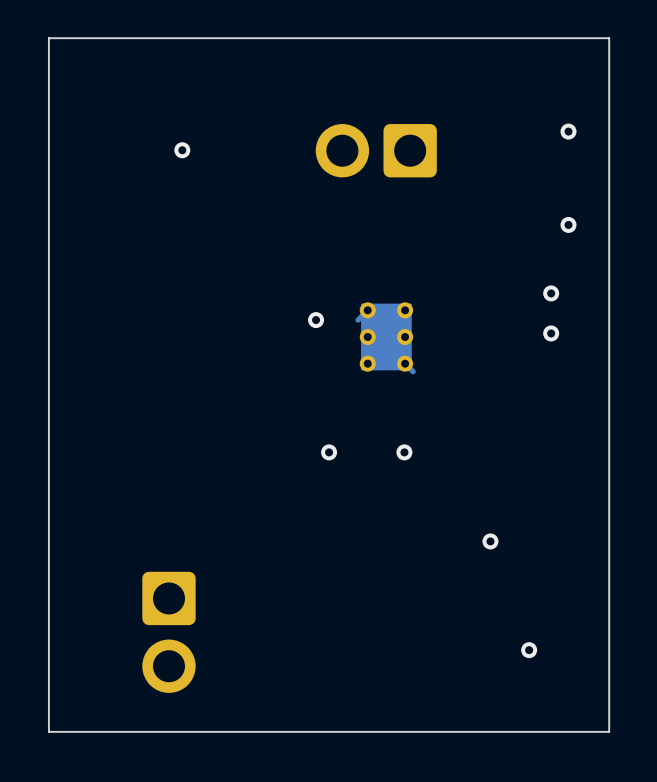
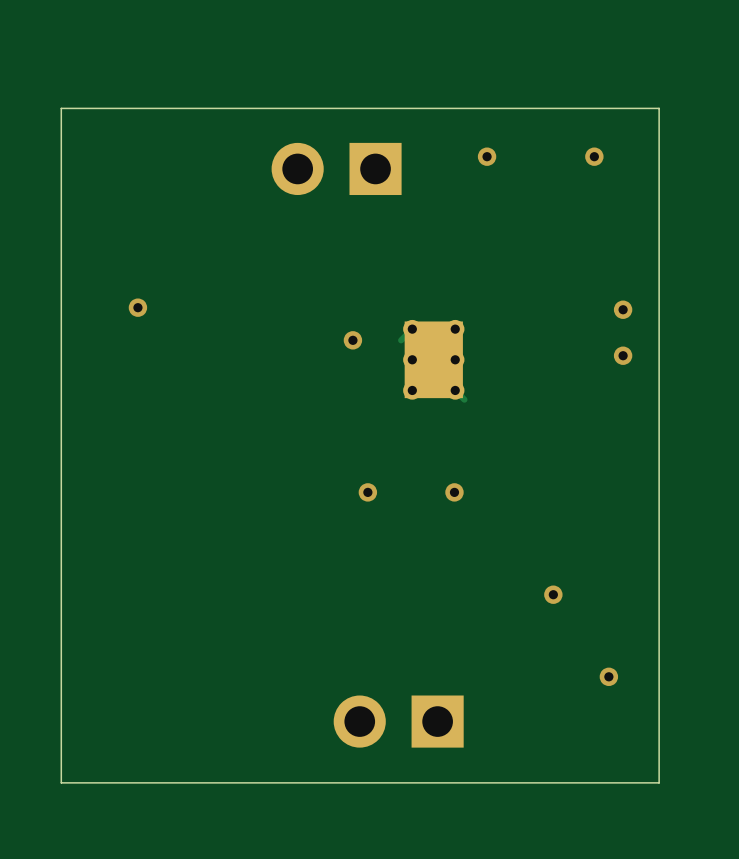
board edge: (609, 38) (48, 38) (48, 731) (609, 731) (609, 38) -> (659, 108) (659, 782) (61, 782) (61, 108) (659, 108)
via: (568, 131) -> none
via: (182, 150) -> none
part: (376, 150) -> none
via: none -> (487, 156)
via: none -> (594, 156)
part: none -> (336, 168)
via: (568, 224) -> none
via: none -> (137, 307)
part: (168, 632) -> none
via position: (529, 650) -> (608, 676)
part: none -> (398, 721)

